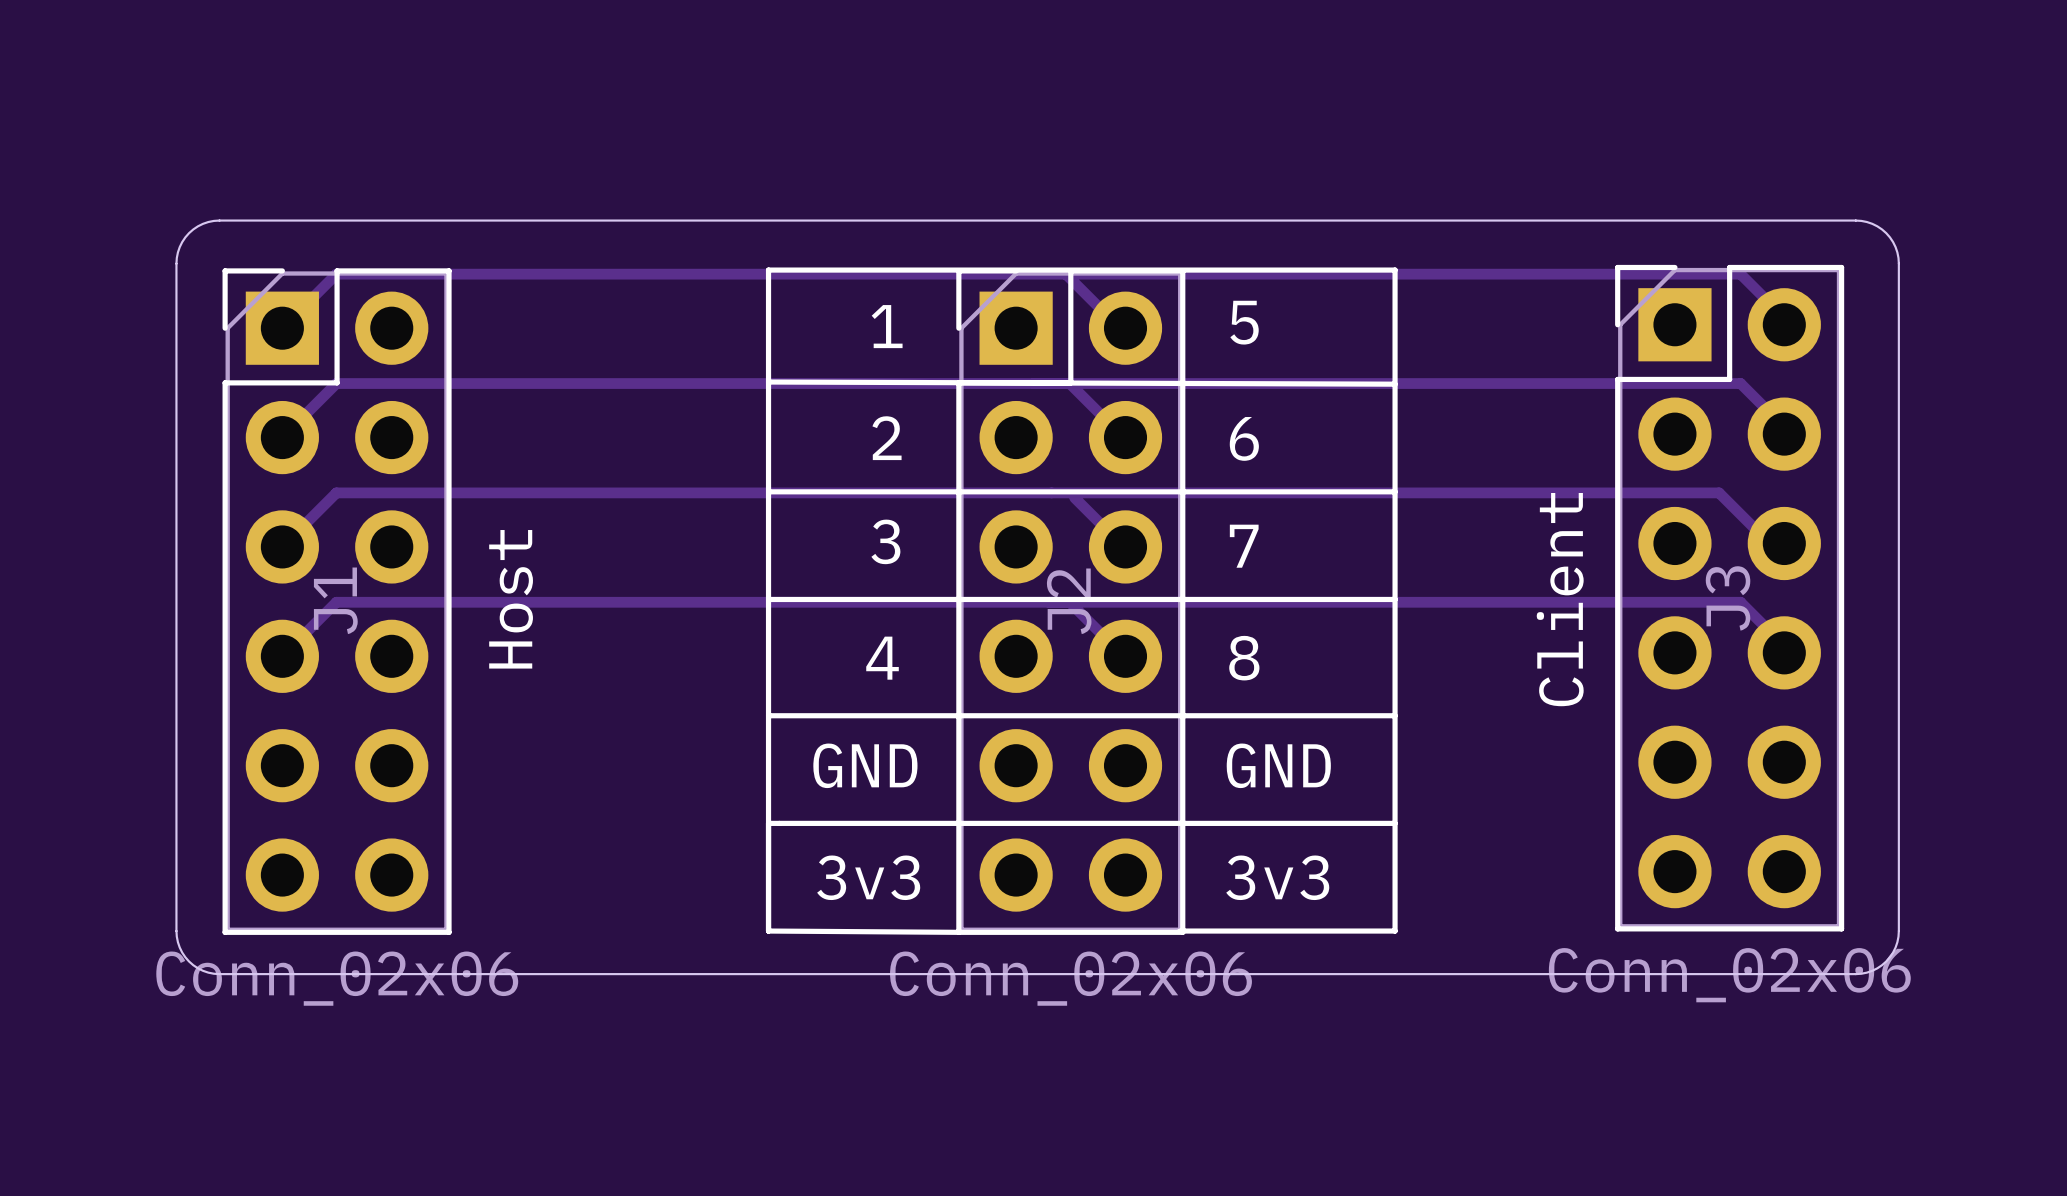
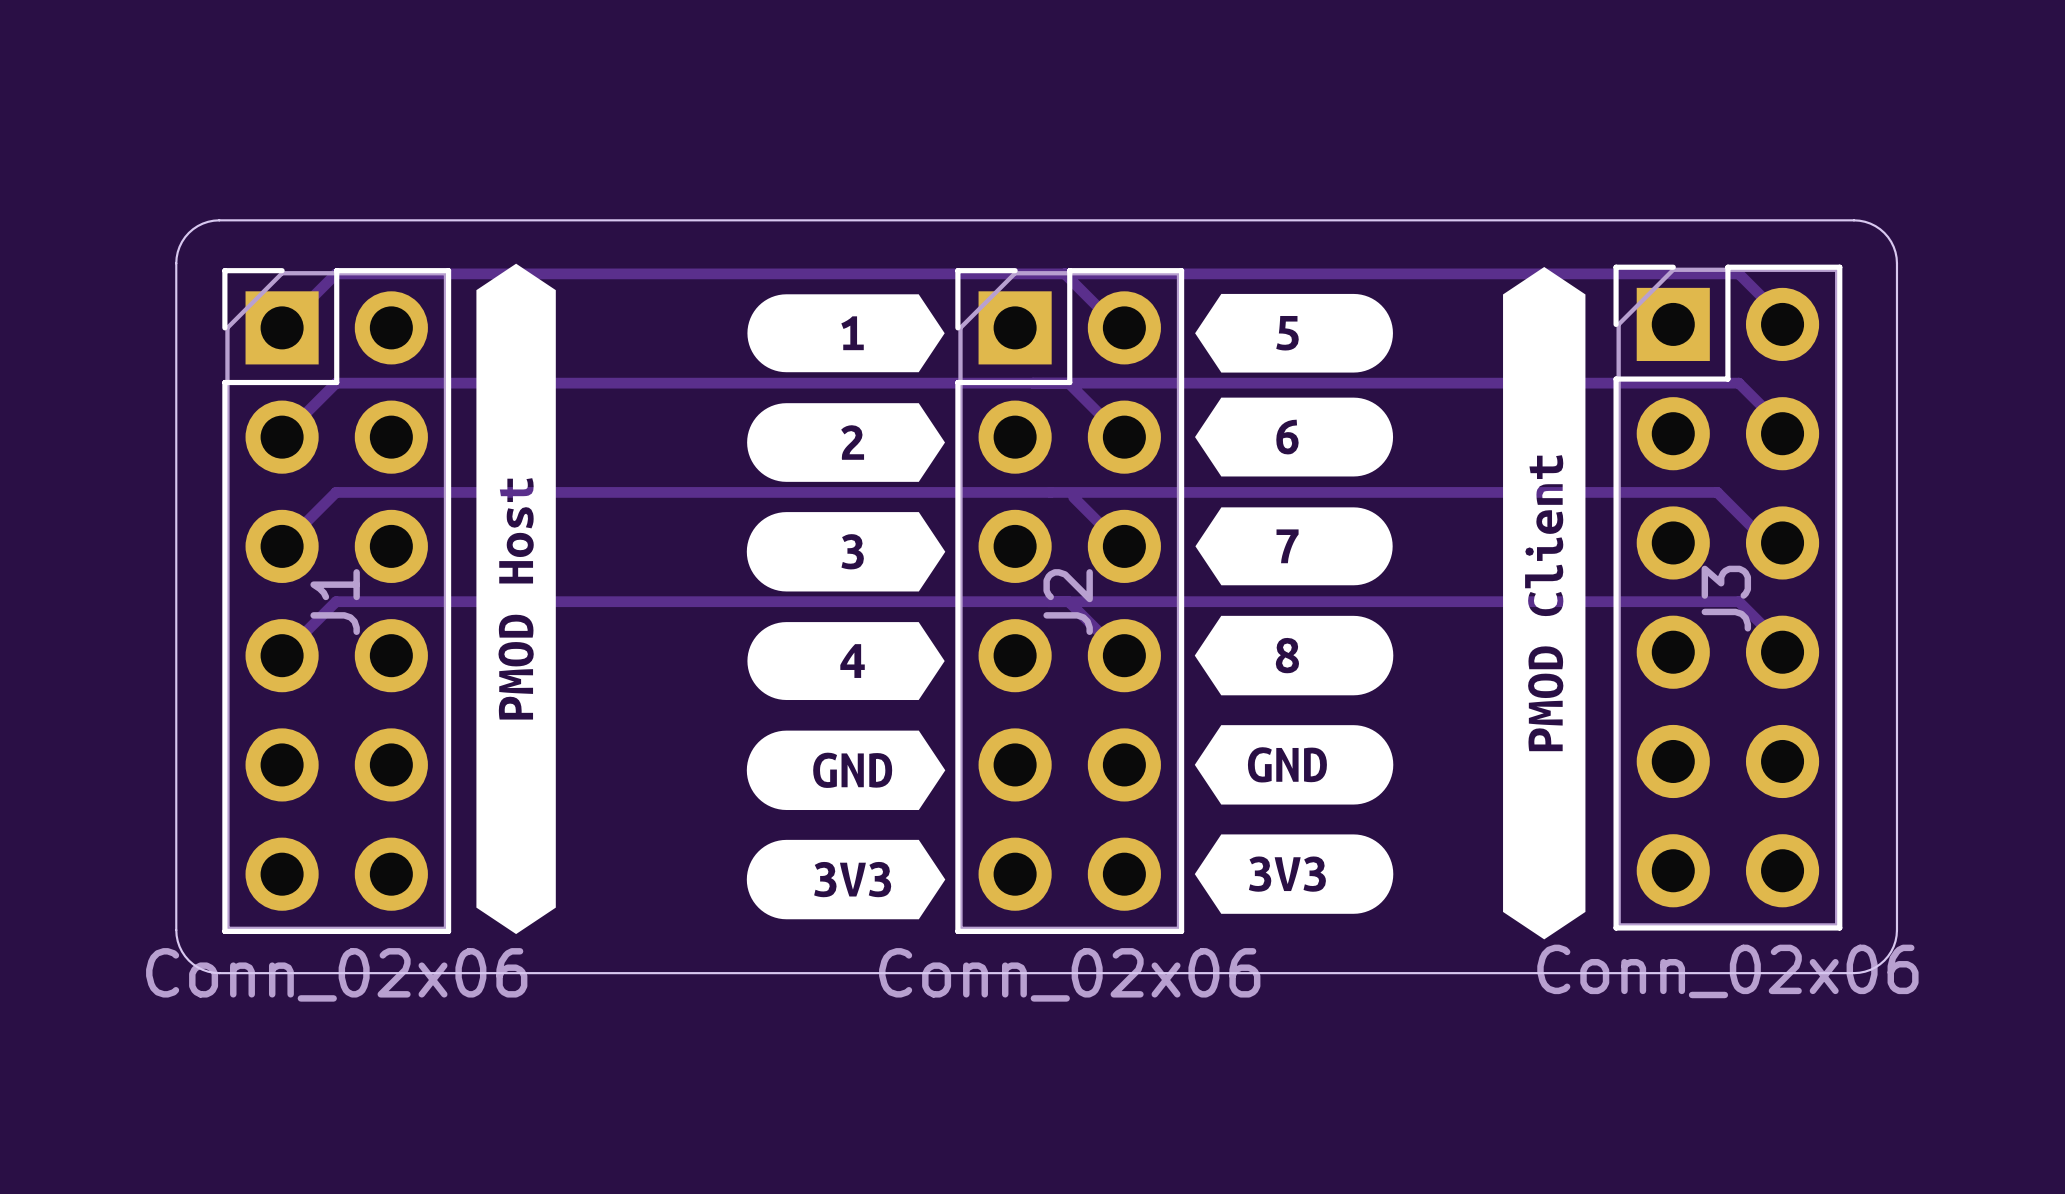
drawing: none -> [476, 263, 556, 935]
drawing: none -> [1503, 266, 1586, 940]
drawing: none -> [746, 294, 946, 920]
drawing: none -> [1194, 293, 1394, 914]
text: 5 (1244, 322) -> none
text: 1 (887, 326) -> none
line: (768, 382) (1395, 384) -> none
text: 2 (887, 438) -> none
text: 6 (1244, 438) -> none
line: (770, 491) (1395, 491) -> none
text: 3 (885, 541) -> none
text: 7 (1244, 546) -> none
text: Host (511, 599) -> none
line: (770, 599) (1395, 599) -> none
text: Client (1560, 599) -> none
text: 4 (882, 658) -> none
text: 8 (1244, 658) -> none
line: (768, 715) (1395, 715) -> none
text: GND (865, 765) -> none
text: GND (1278, 765) -> none
line: (768, 823) (1395, 823) -> none
text: 3v3 (868, 877) -> none
text: 3v3 (1277, 877) -> none
line: (1179, 931) (1395, 931) (1395, 270) (768, 270) (768, 931) (957, 932) -> none

